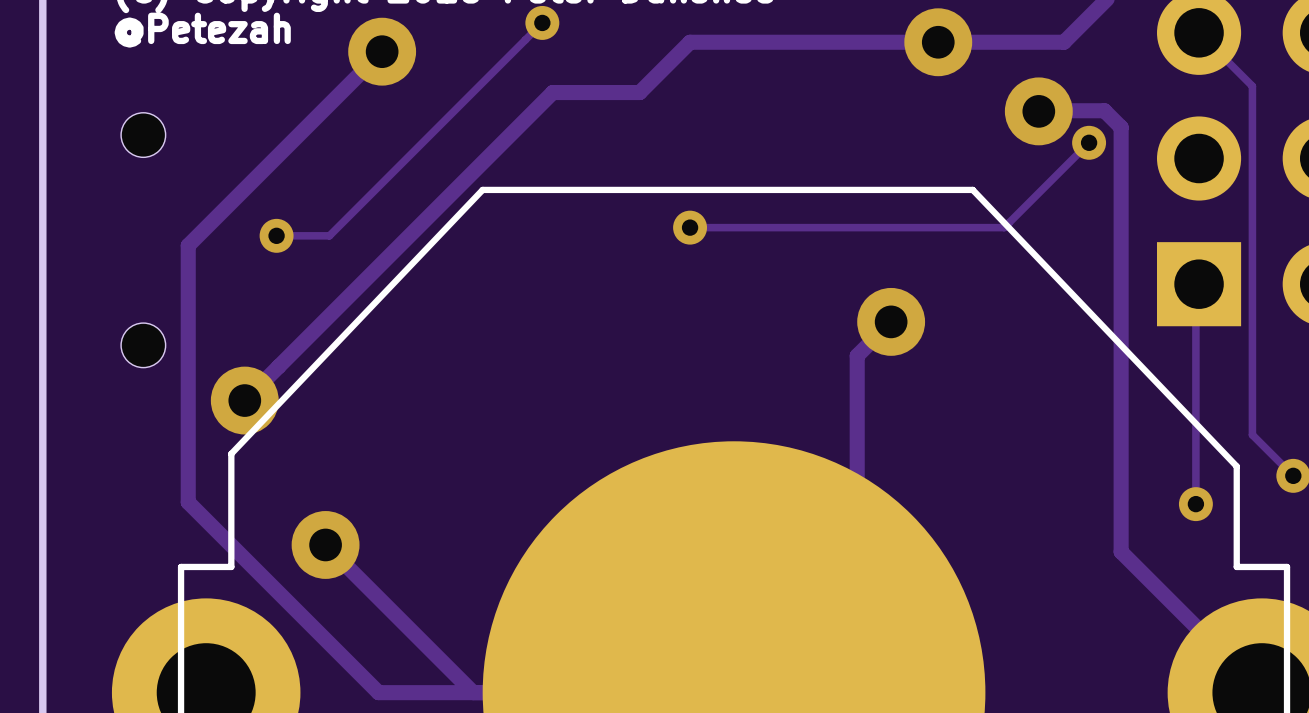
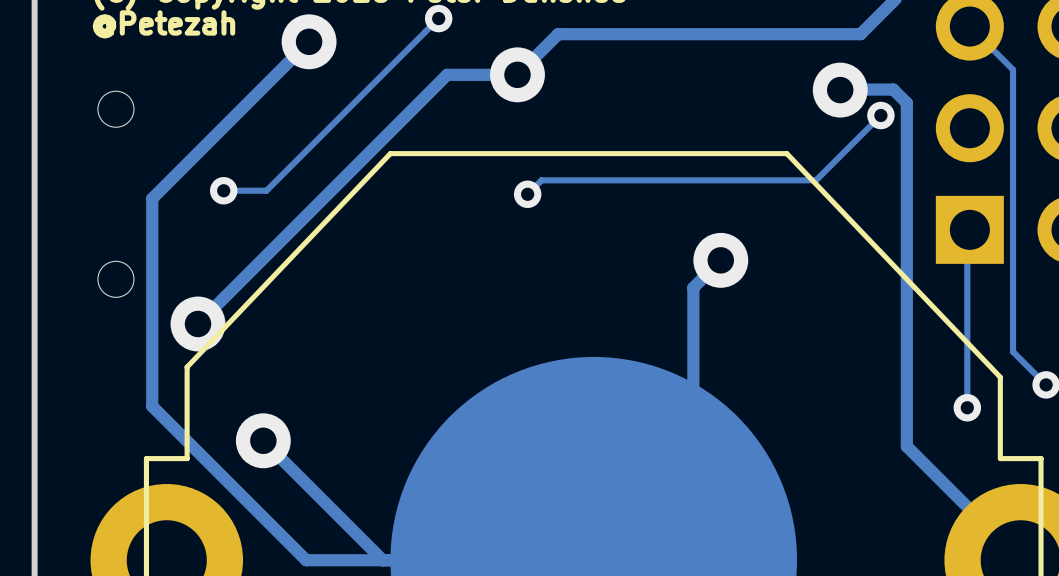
via: (938, 42) -> none
via: none -> (517, 74)
track: (1008, 222) (1004, 227) (690, 227) -> (816, 180) (541, 180) (527, 194)
via position: (690, 227) -> (527, 194)

